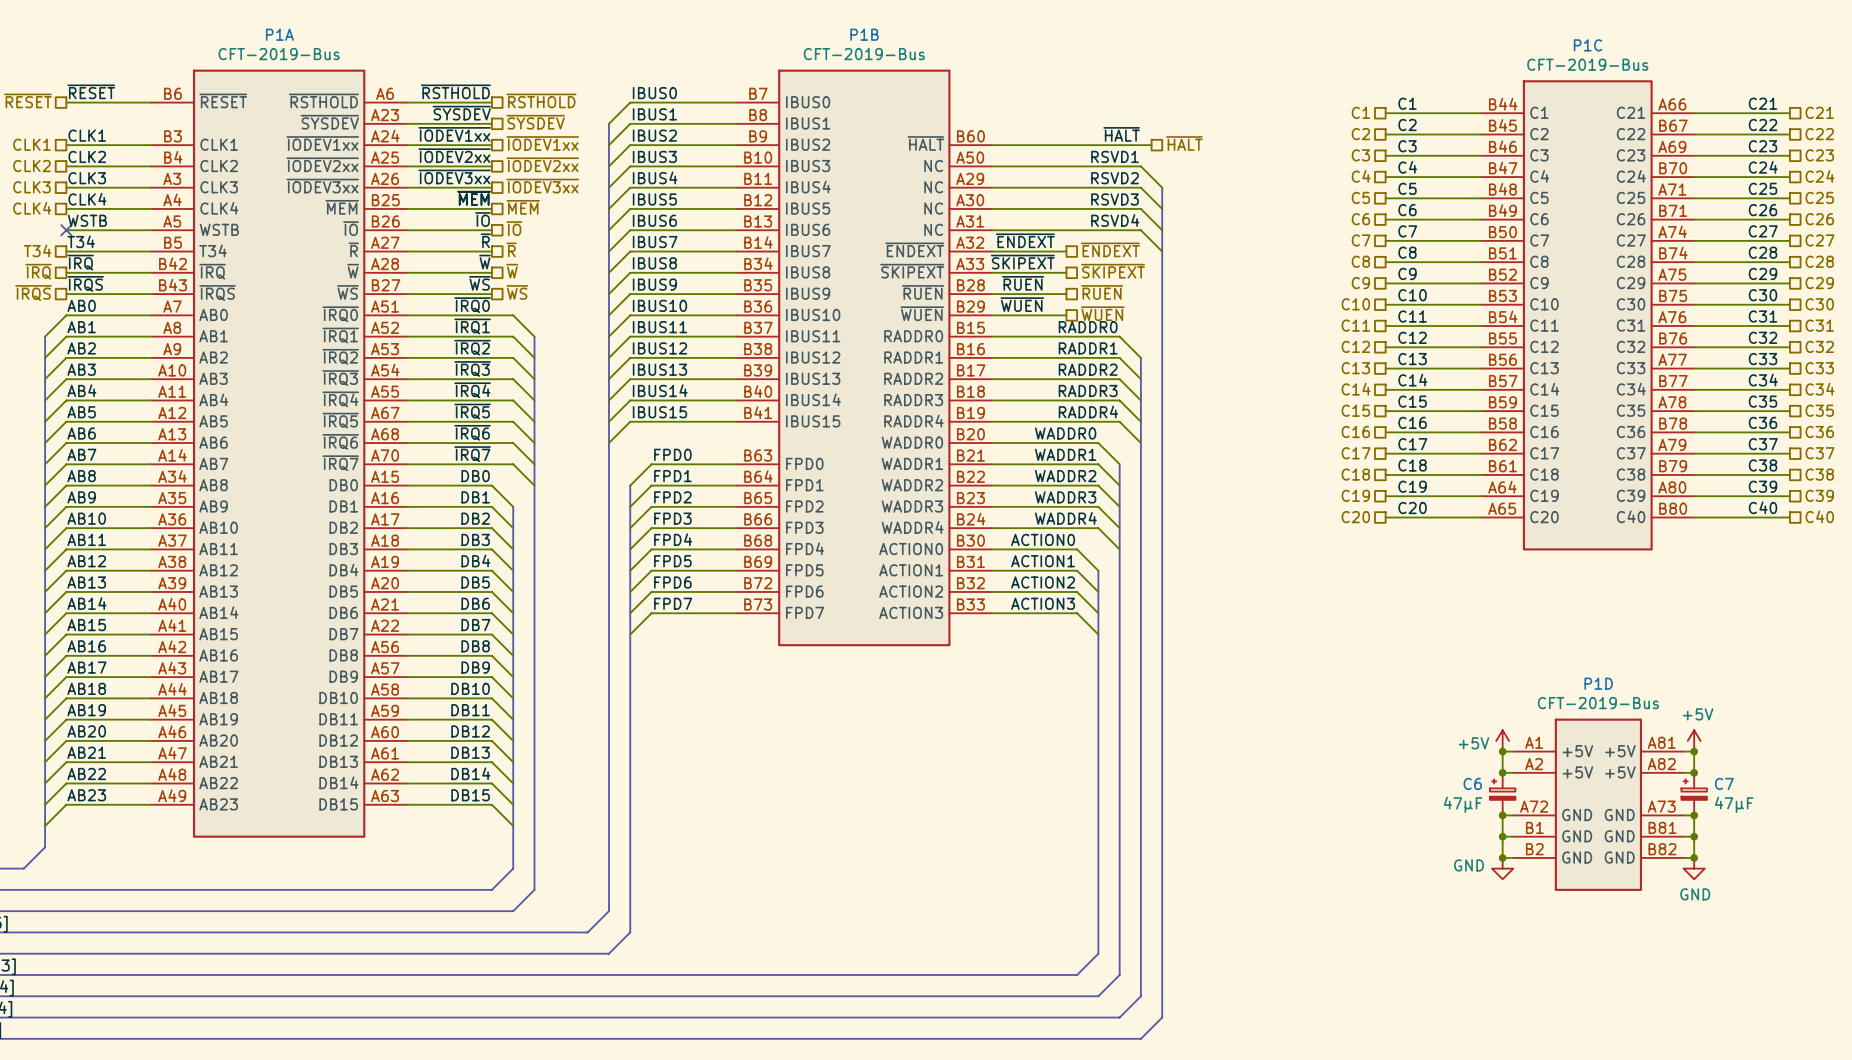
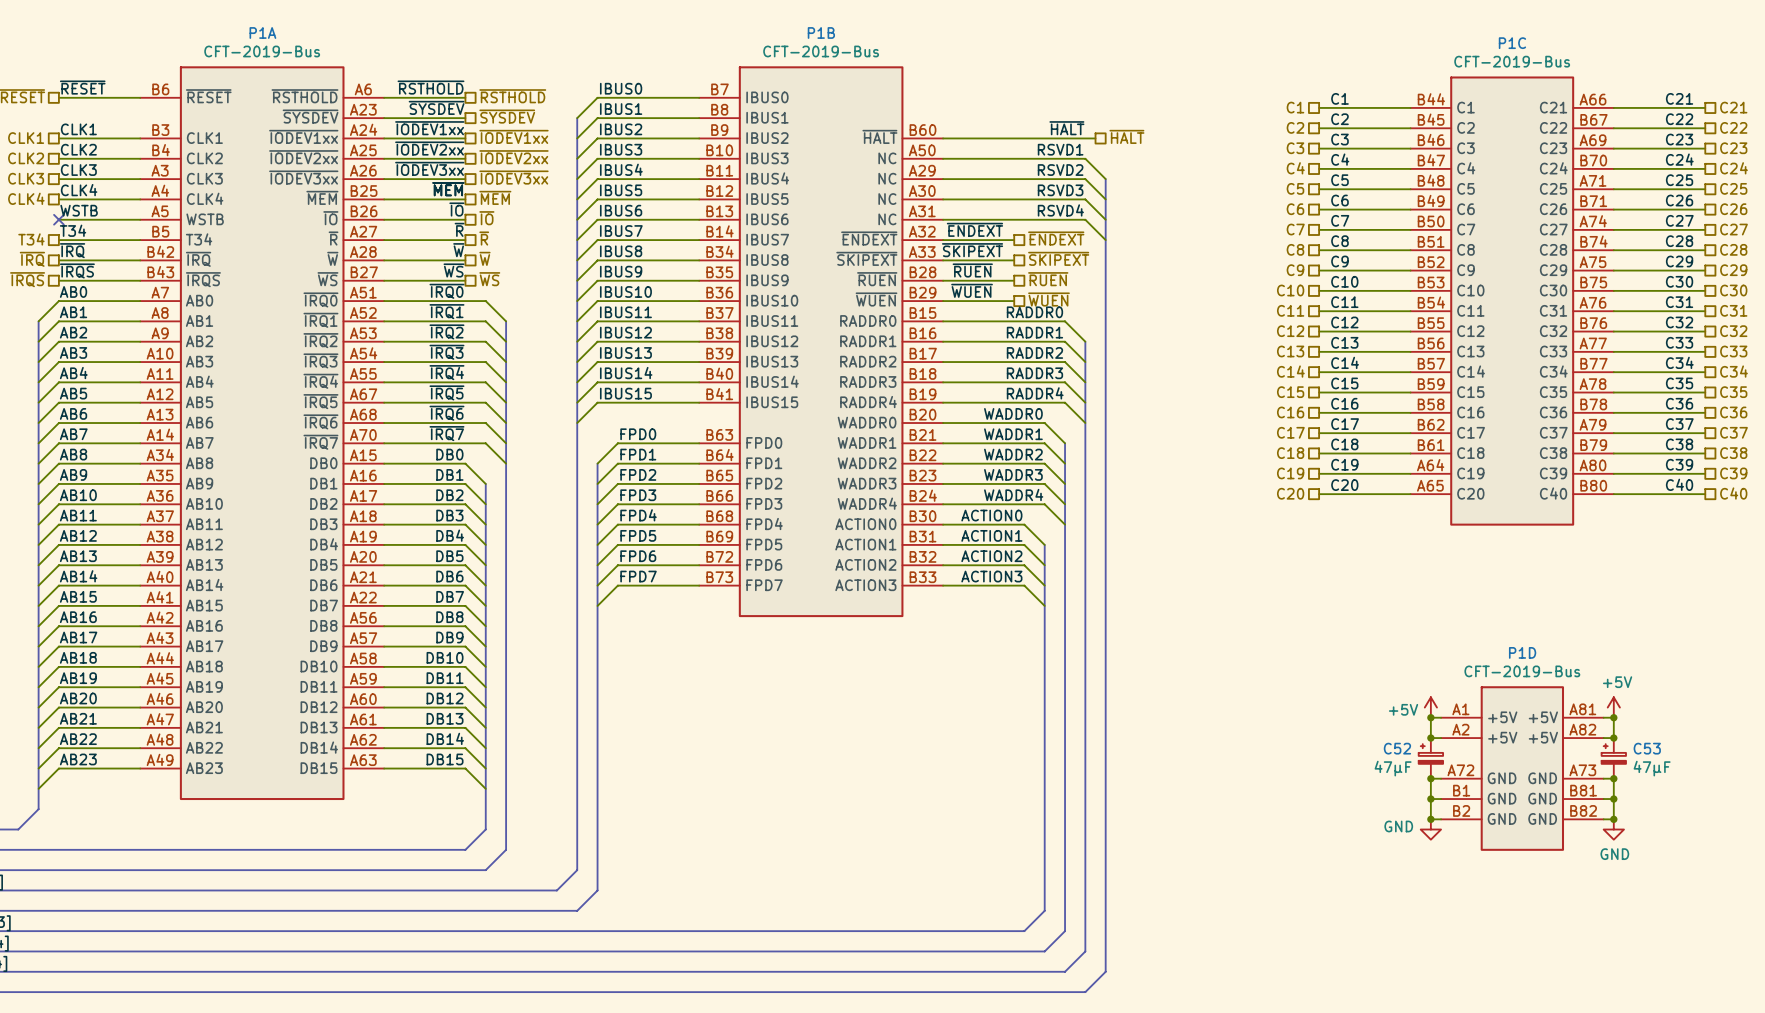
C6 name: C6 (1472, 783) -> C52 (1397, 748)
C7 name: C7 (1724, 783) -> C53 (1647, 748)

